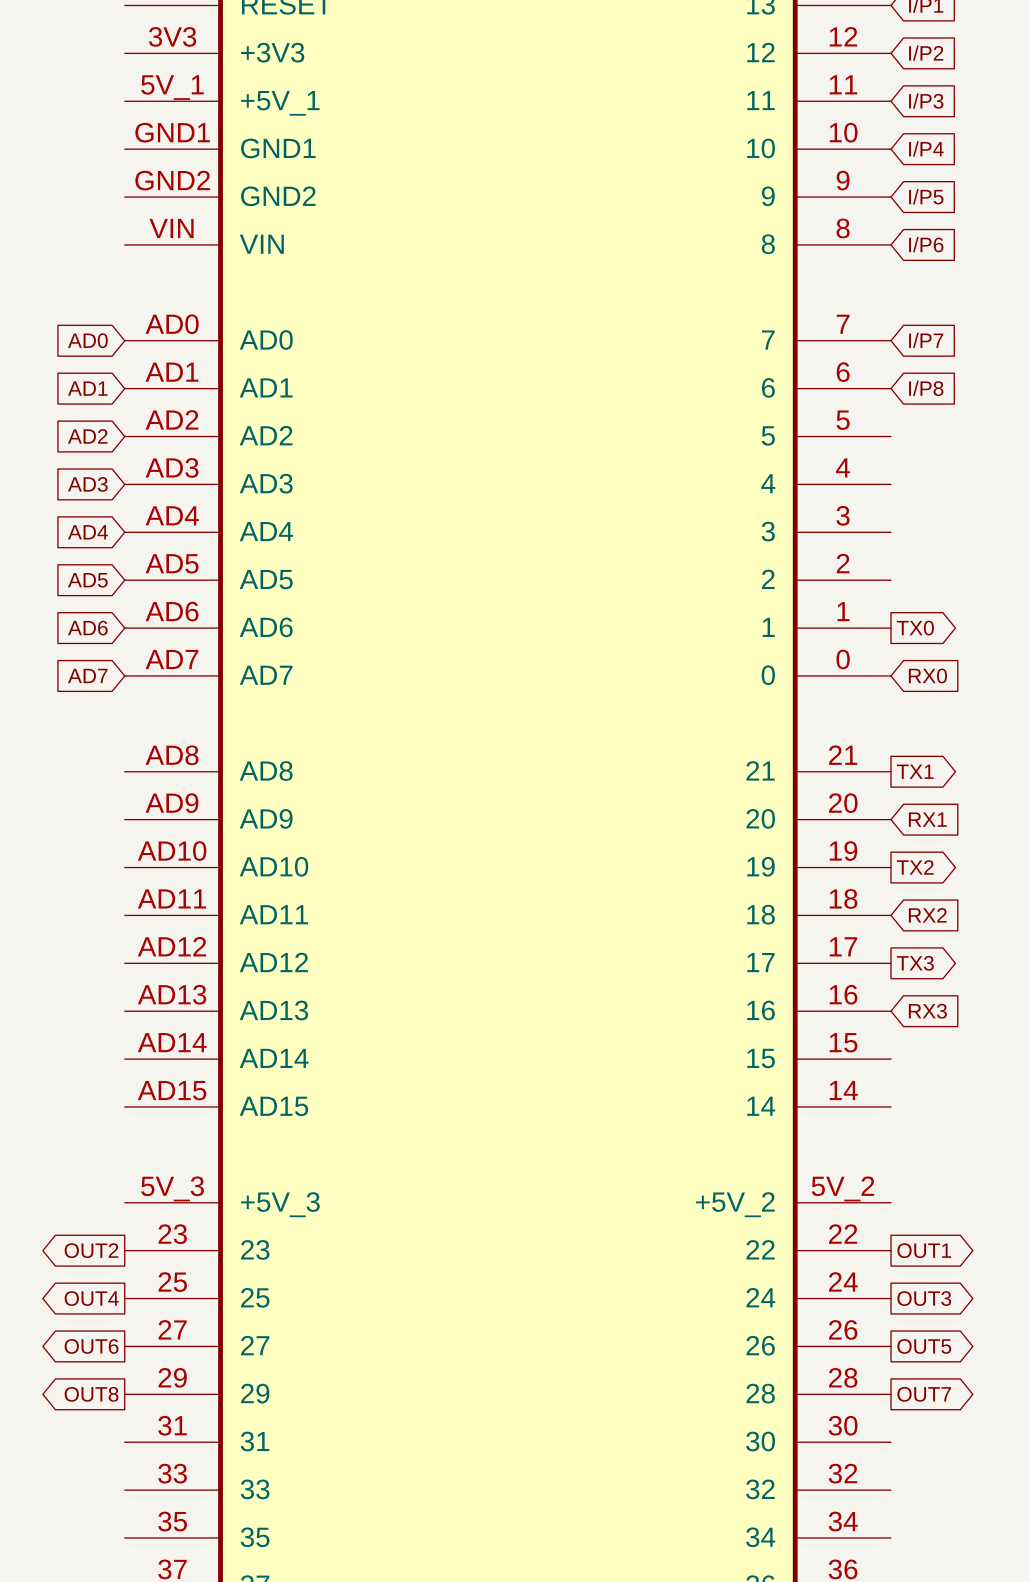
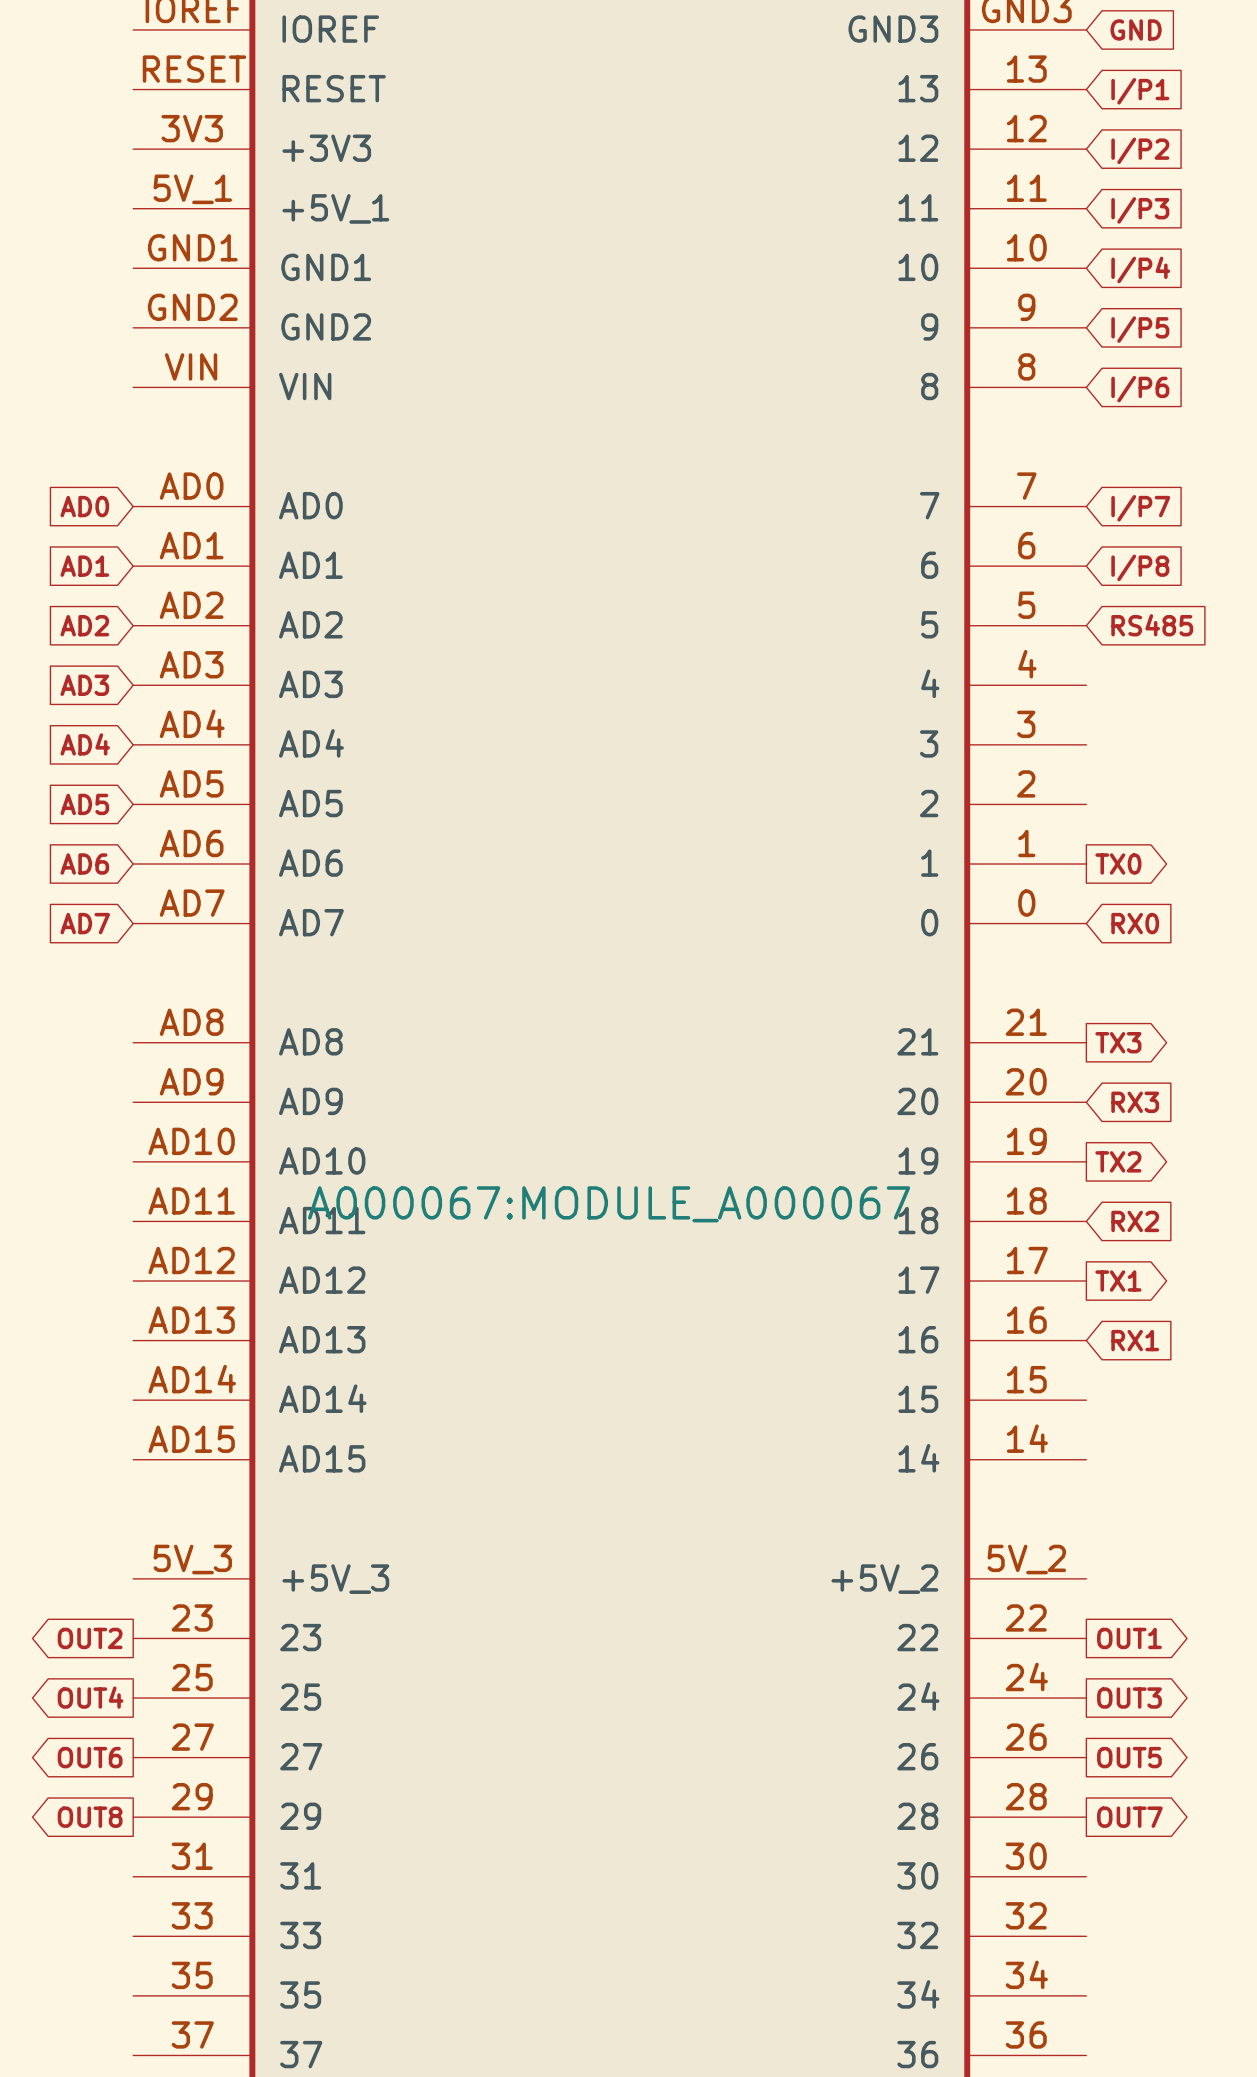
global label: none -> RS485 (1152, 625)
global label: TX1 (915, 771) -> TX3 (1118, 1042)
global label: RX1 (927, 819) -> RX3 (1135, 1102)
part text: none -> A000067:MODULE_A000067 (609, 1204)
global label: TX3 (915, 963) -> TX1 (1118, 1281)
global label: RX3 (927, 1011) -> RX1 (1135, 1340)

